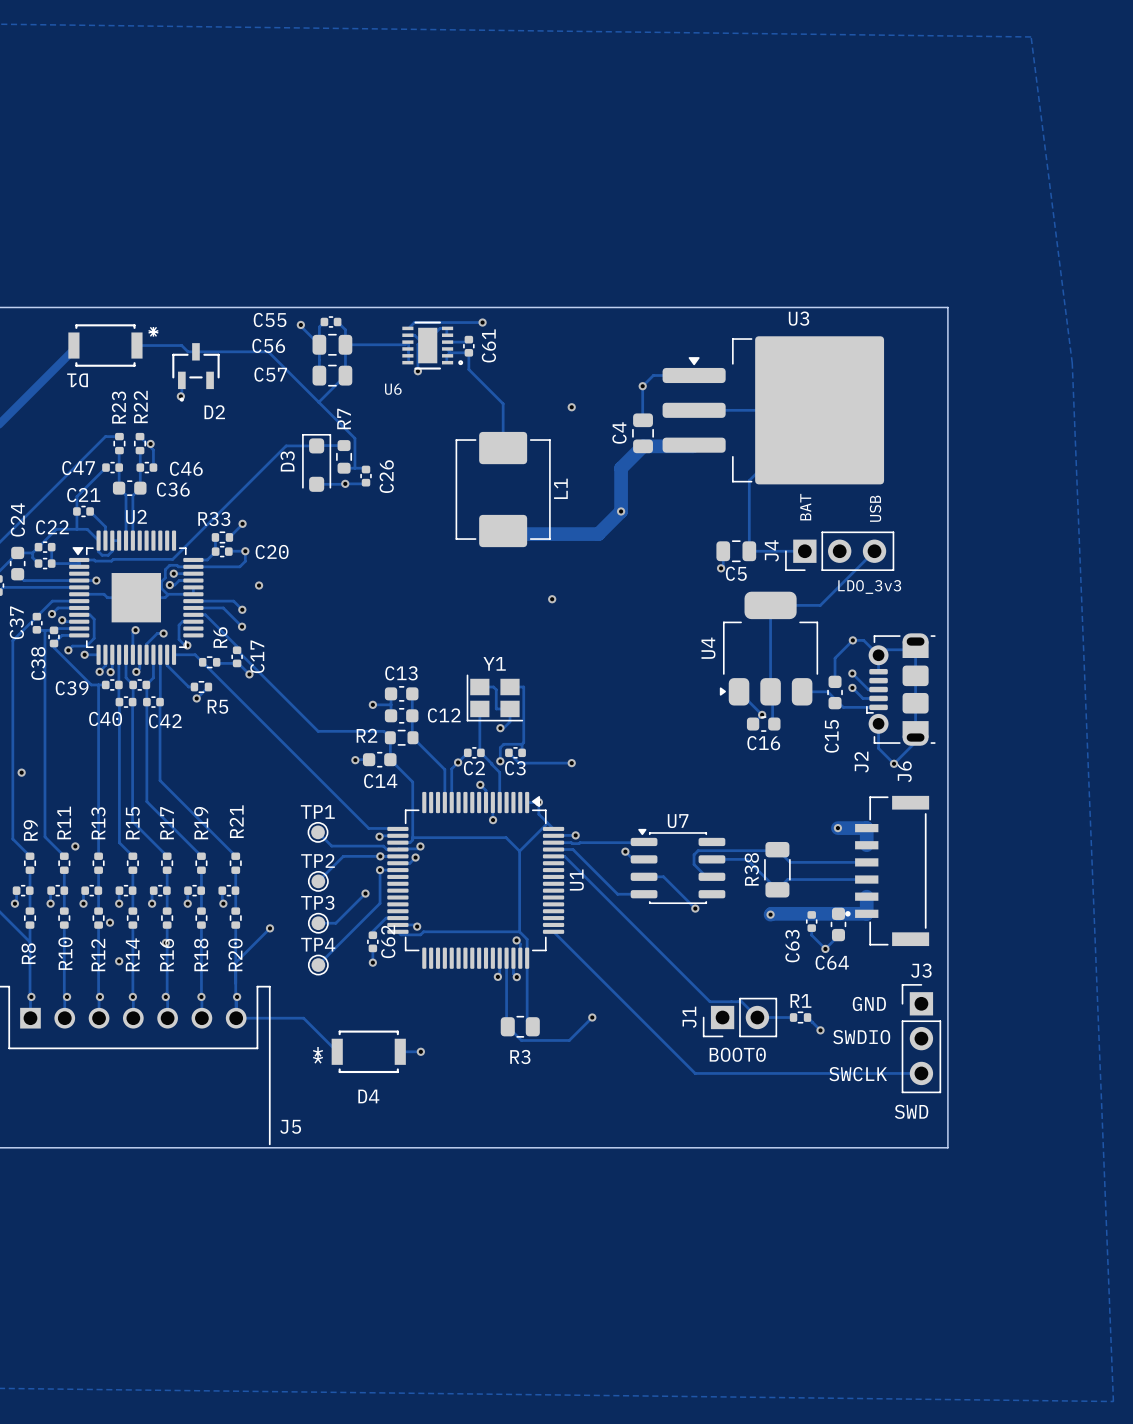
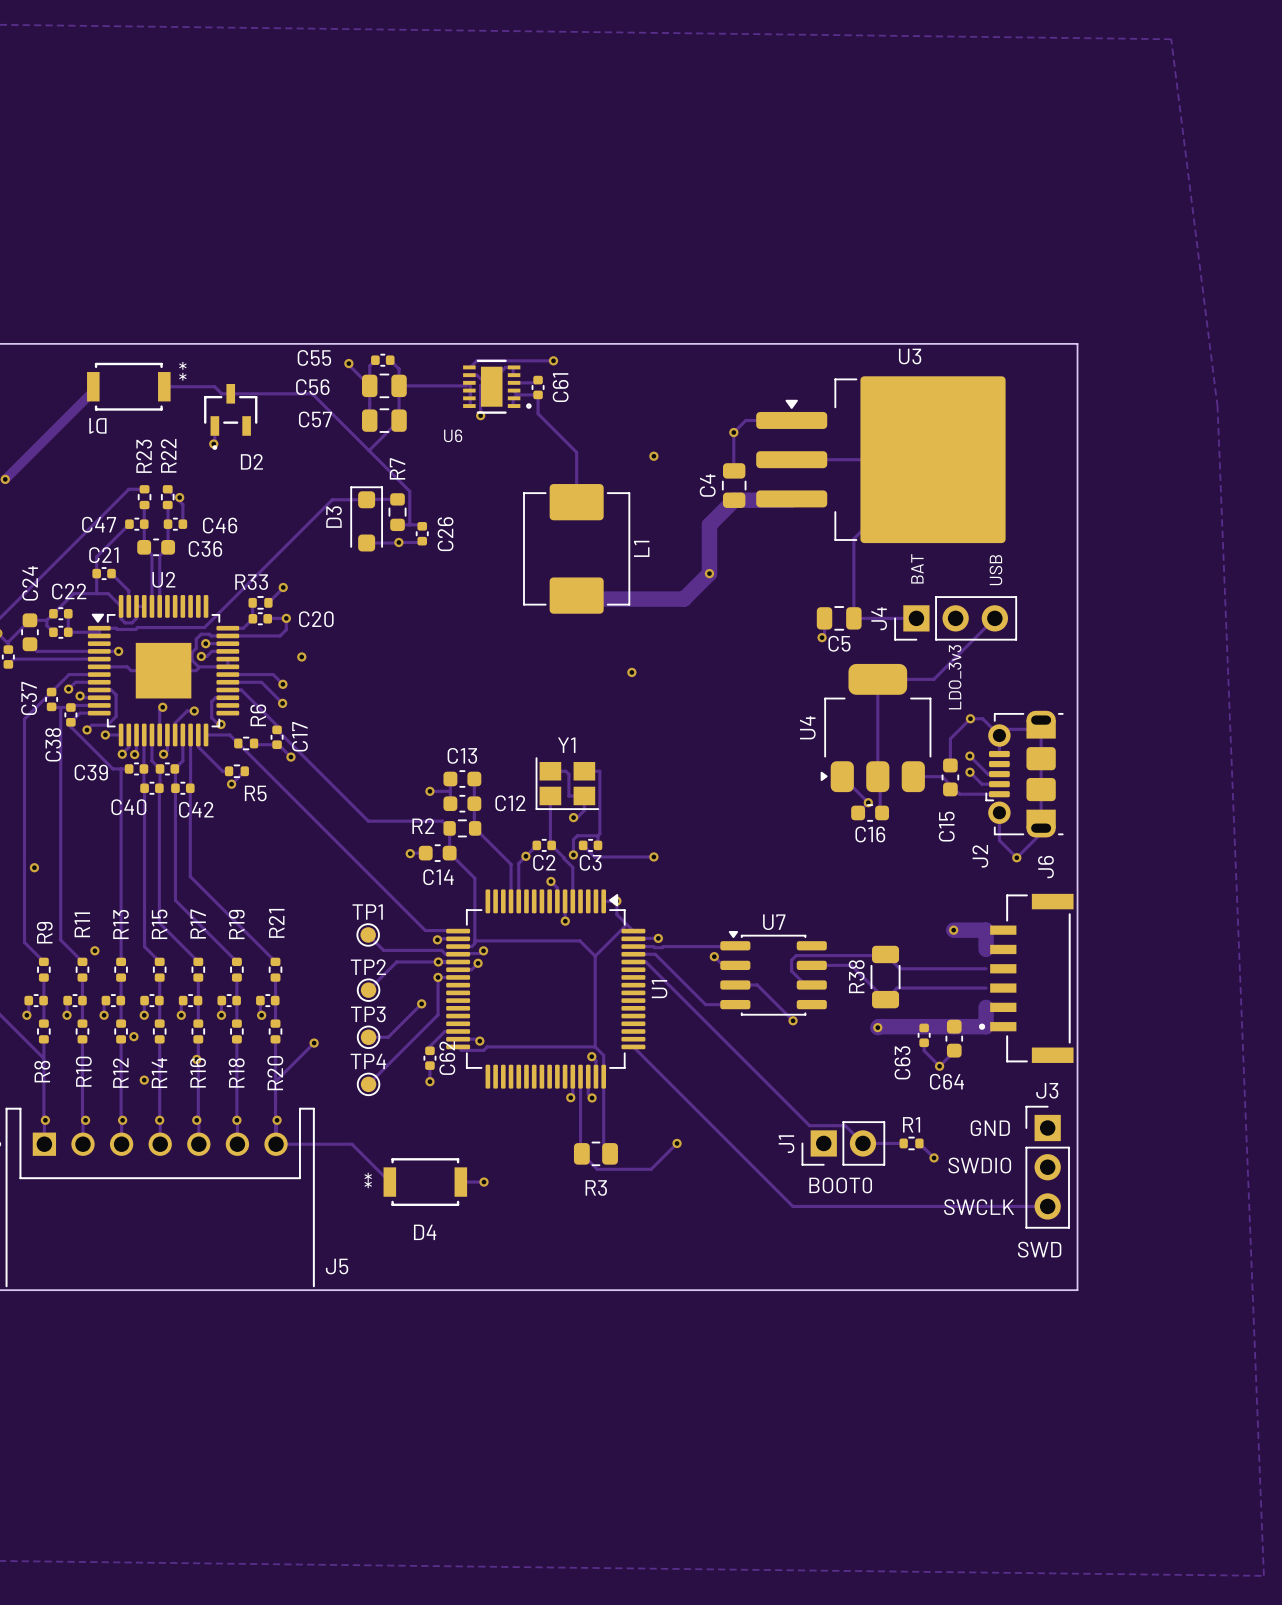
text rotation: 0° (869, 586) -> 90° counterclockwise (955, 677)
J6 position: (887, 870) -> (1026, 978)

